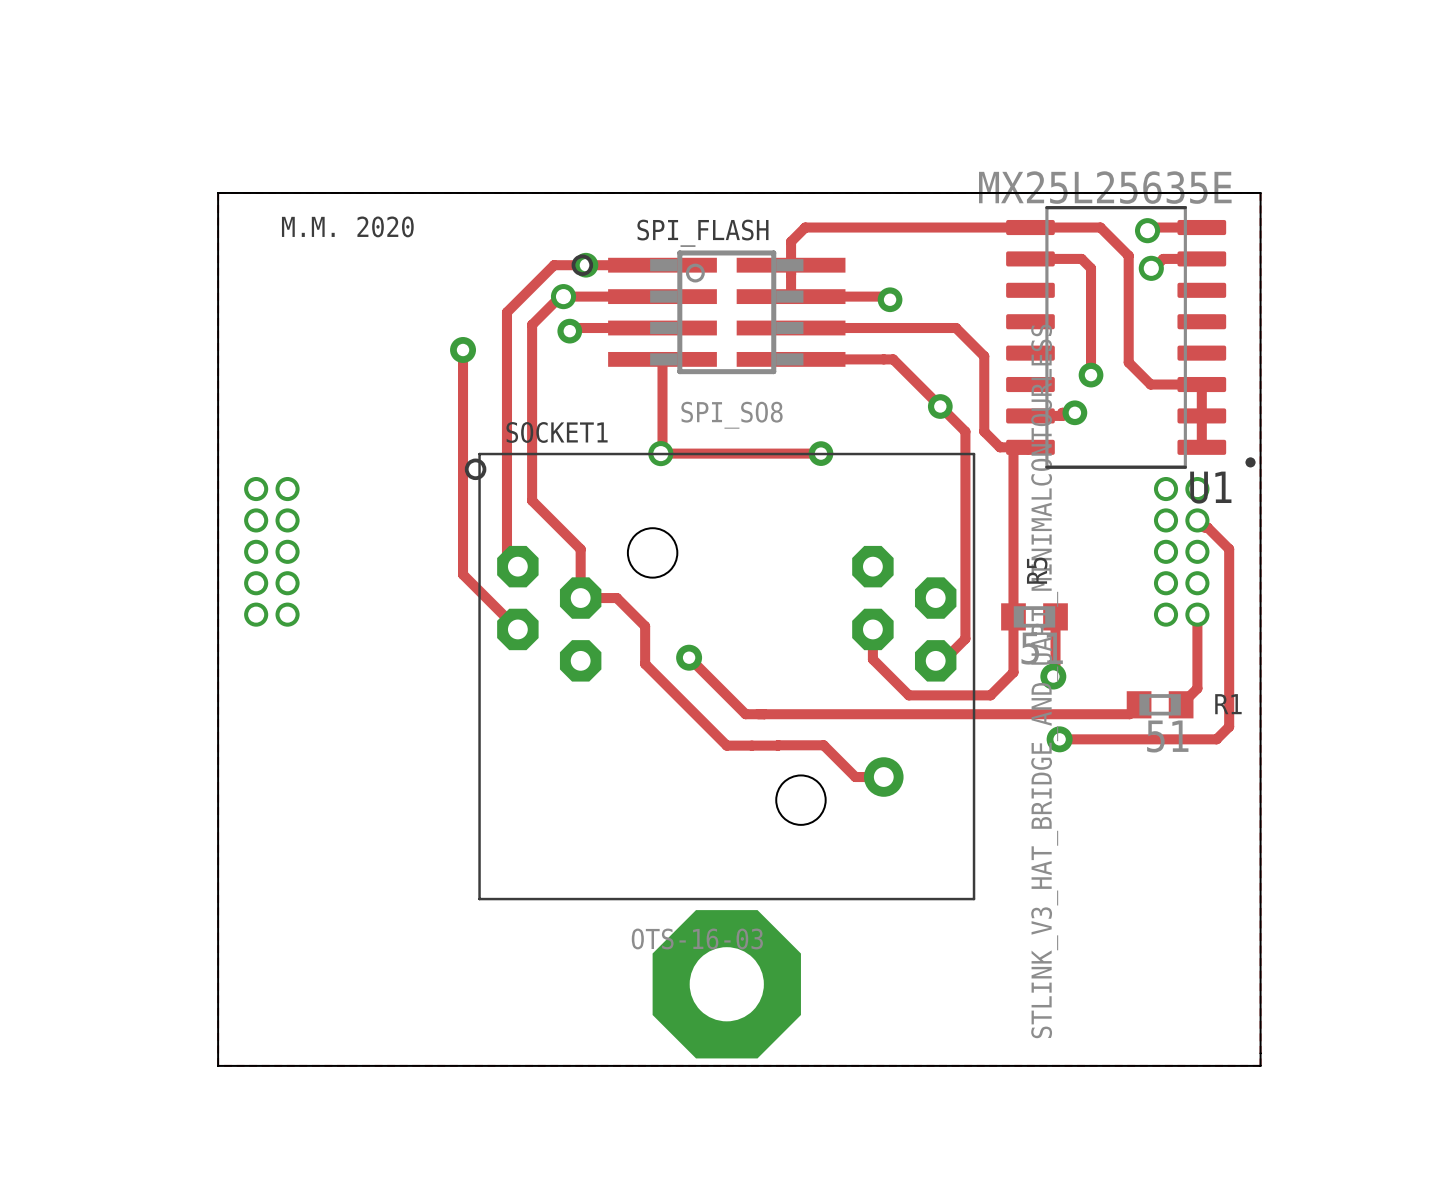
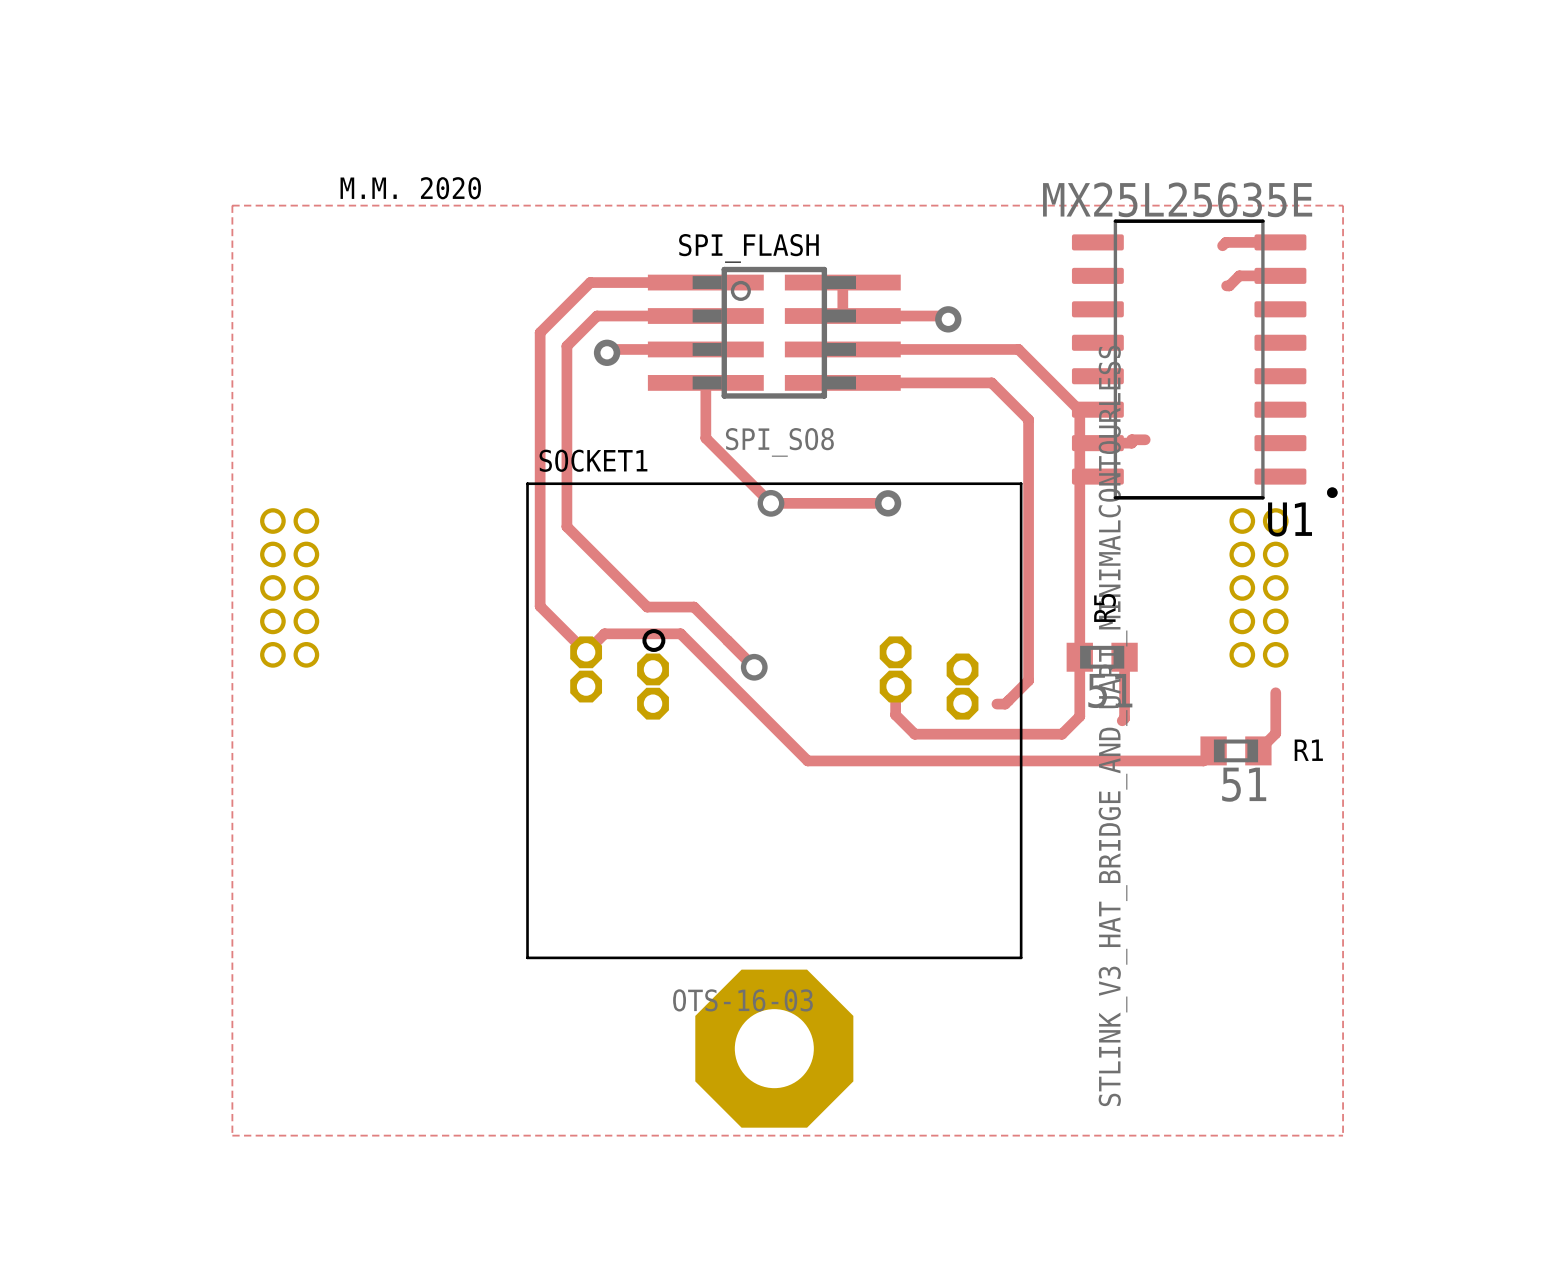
board edge: (218, 192) (1260, 192) (1260, 1065) (218, 1065) (218, 192) -> none
text position: M.M. 2020 (347, 226) -> M.M. 2020 (410, 188)
via: (1147, 230) -> none
drawing: [571, 254, 594, 276] -> none
track: (1030, 258) (1081, 258) (1091, 268) (1091, 375) -> none
via: (585, 265) -> none
track: (791, 265) (791, 241) (805, 227) (1100, 227) (1128, 255) (1128, 362) (1150, 384) (1201, 384) (1201, 447) -> none
via: (1151, 268) -> none
via: (563, 296) -> none
track: (463, 349) (463, 574) (517, 629) -> none
via: (463, 349) -> none
track: (984, 356) (984, 431) (999, 447) (1030, 447) (1028, 449) (1013, 449) -> (1048, 379) (1079, 410) (1079, 478)
track: (893, 359) (965, 431) -> (951, 382) (991, 382) (1028, 419) (1028, 459)
via: (1091, 375) -> none
via: (940, 406) -> none
track: (662, 411) (662, 453) -> (705, 438) (770, 503) (888, 503)
via: (1074, 412) -> none
SOCKET1 footprint: [478, 452, 976, 901] -> [526, 482, 1023, 960]
track: (660, 453) (820, 453) -> none
via position: (660, 453) -> (770, 503)
via position: (820, 453) -> (888, 503)
drawing: [464, 458, 487, 481] -> none
track: (532, 494) (532, 500) (580, 549) (580, 598) (616, 598) (645, 626) (645, 663) (726, 745) (777, 745) -> (566, 526) (647, 607) (694, 607) (754, 667)
track: (1197, 520) (1204, 527) (1207, 527) (1229, 549) (1229, 726) (1216, 739) (1059, 739) -> none
drawing: none -> [642, 629, 666, 652]
track: (1197, 614) (1197, 650) -> none
via: none -> (754, 667)
track: (872, 629) (872, 659) (908, 695) (990, 695) (996, 689) -> (895, 686) (895, 714) (914, 734) (1062, 734)
track: (689, 657) (745, 714) (758, 714) -> (540, 606) (586, 652) (604, 633) (680, 633) (807, 760)
via: (689, 657) -> none
via: (1053, 676) -> none
via: (1059, 739) -> none
track: (778, 745) (823, 745) (855, 777) (883, 777) -> none
via: (883, 777) -> none

